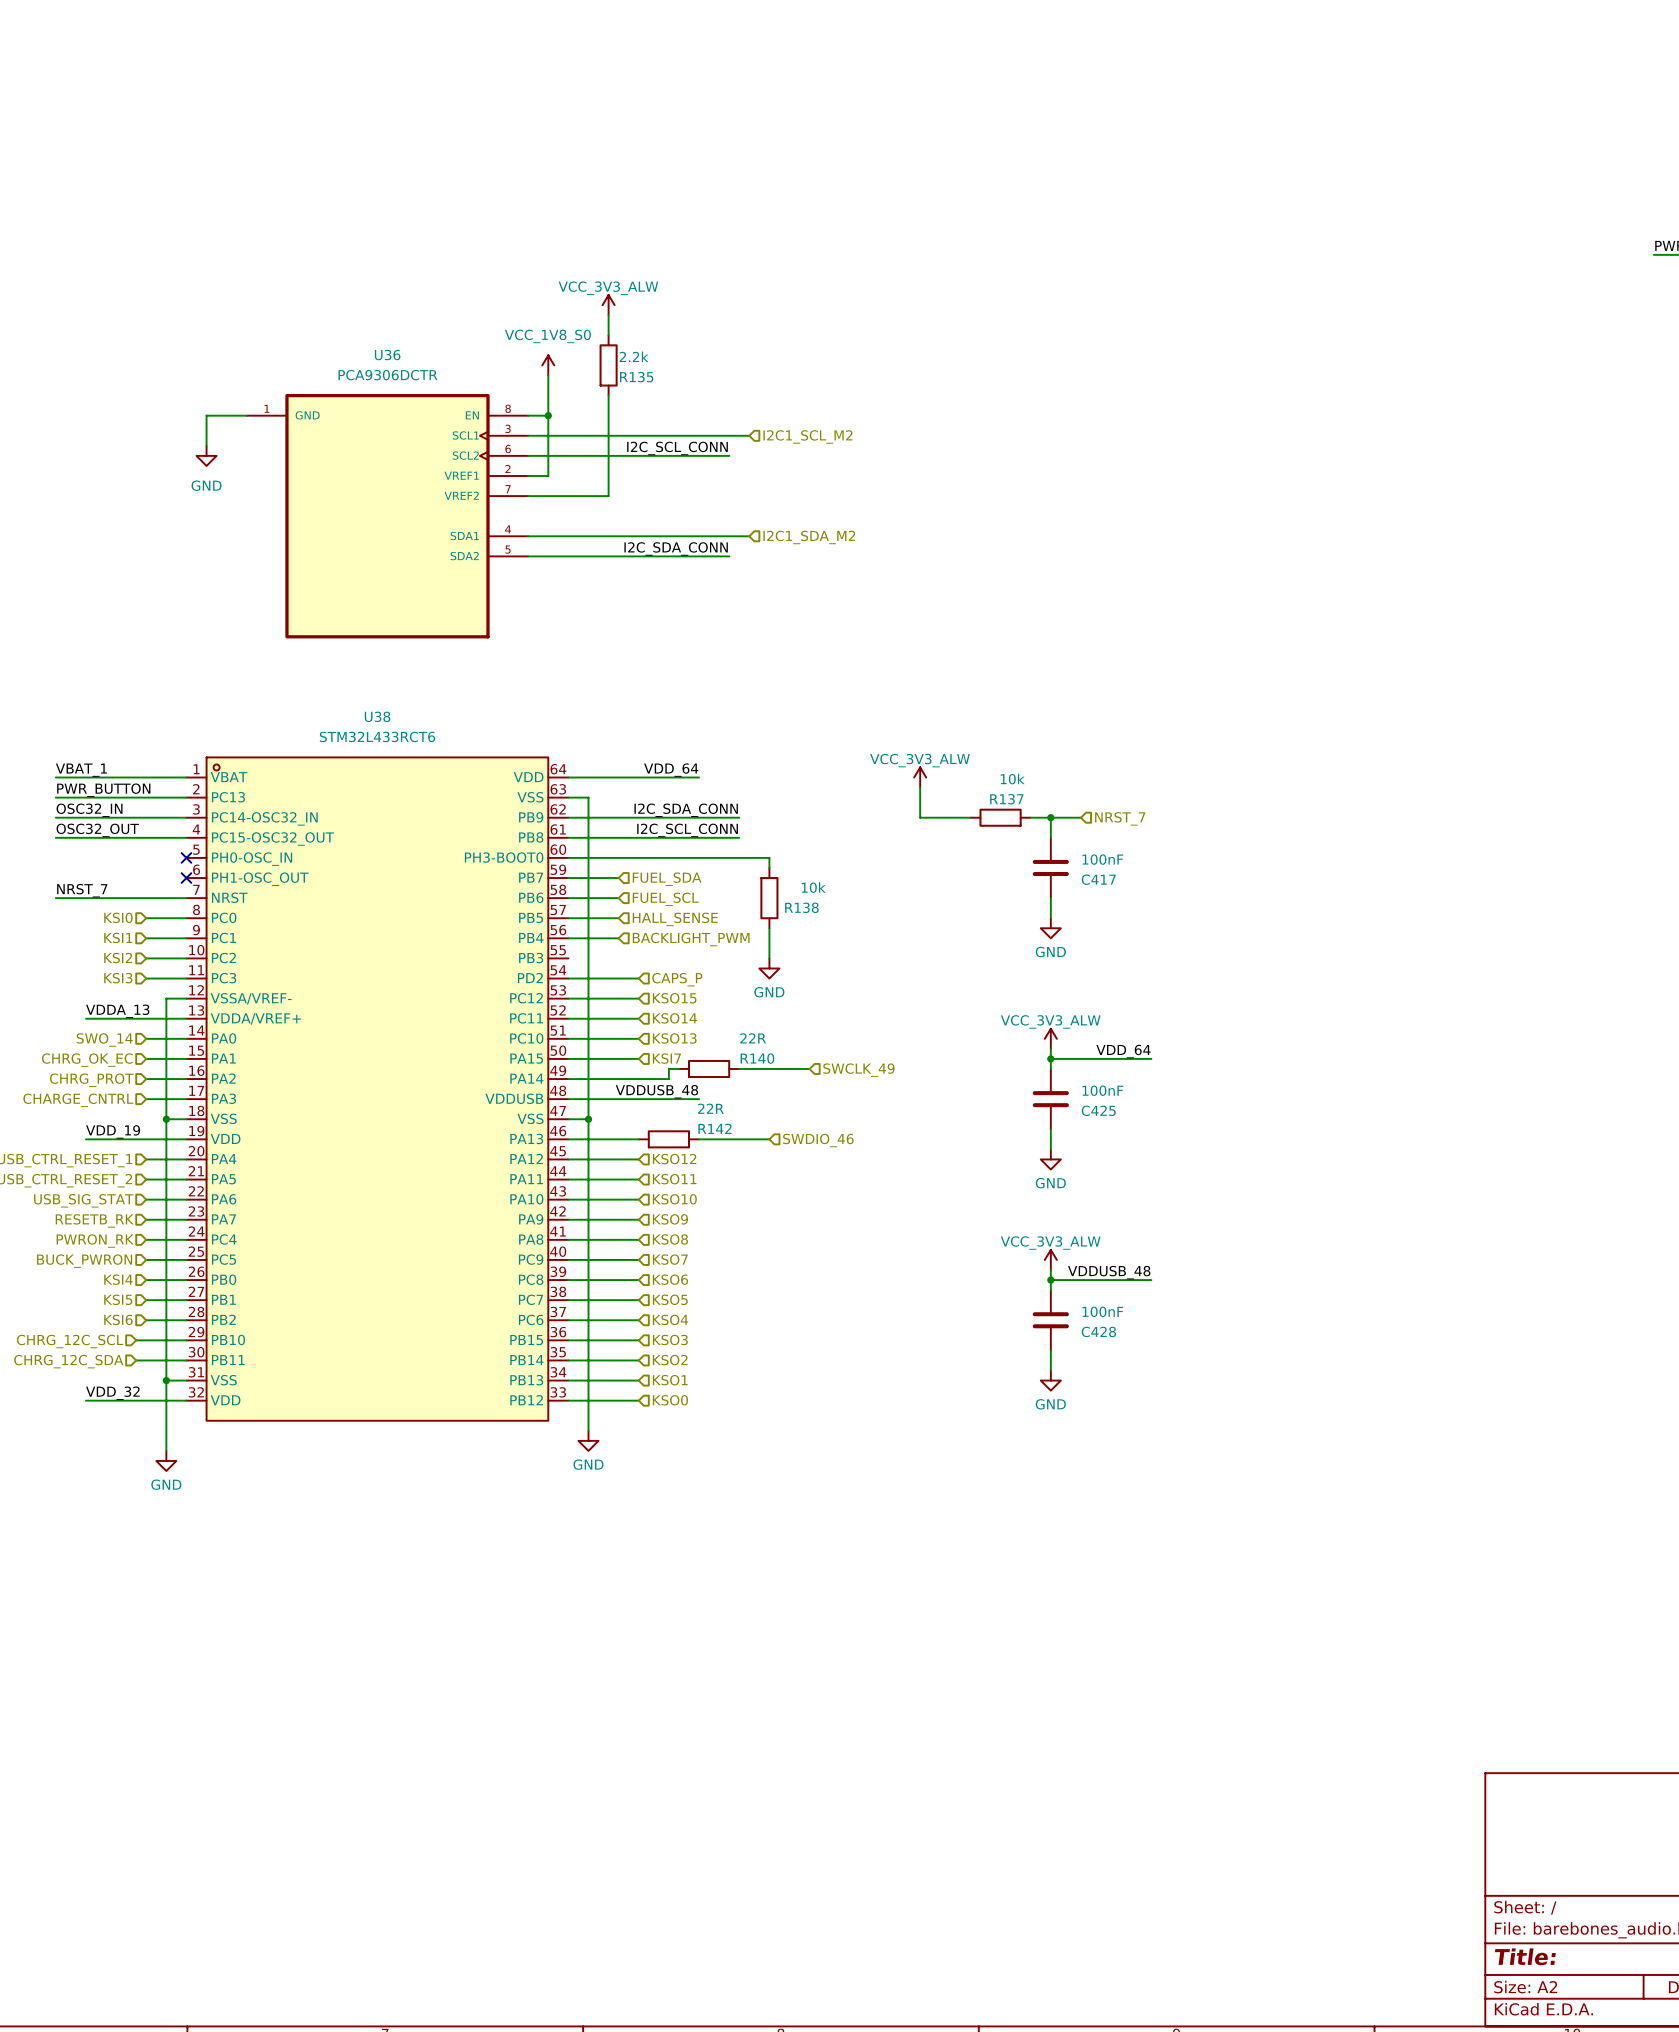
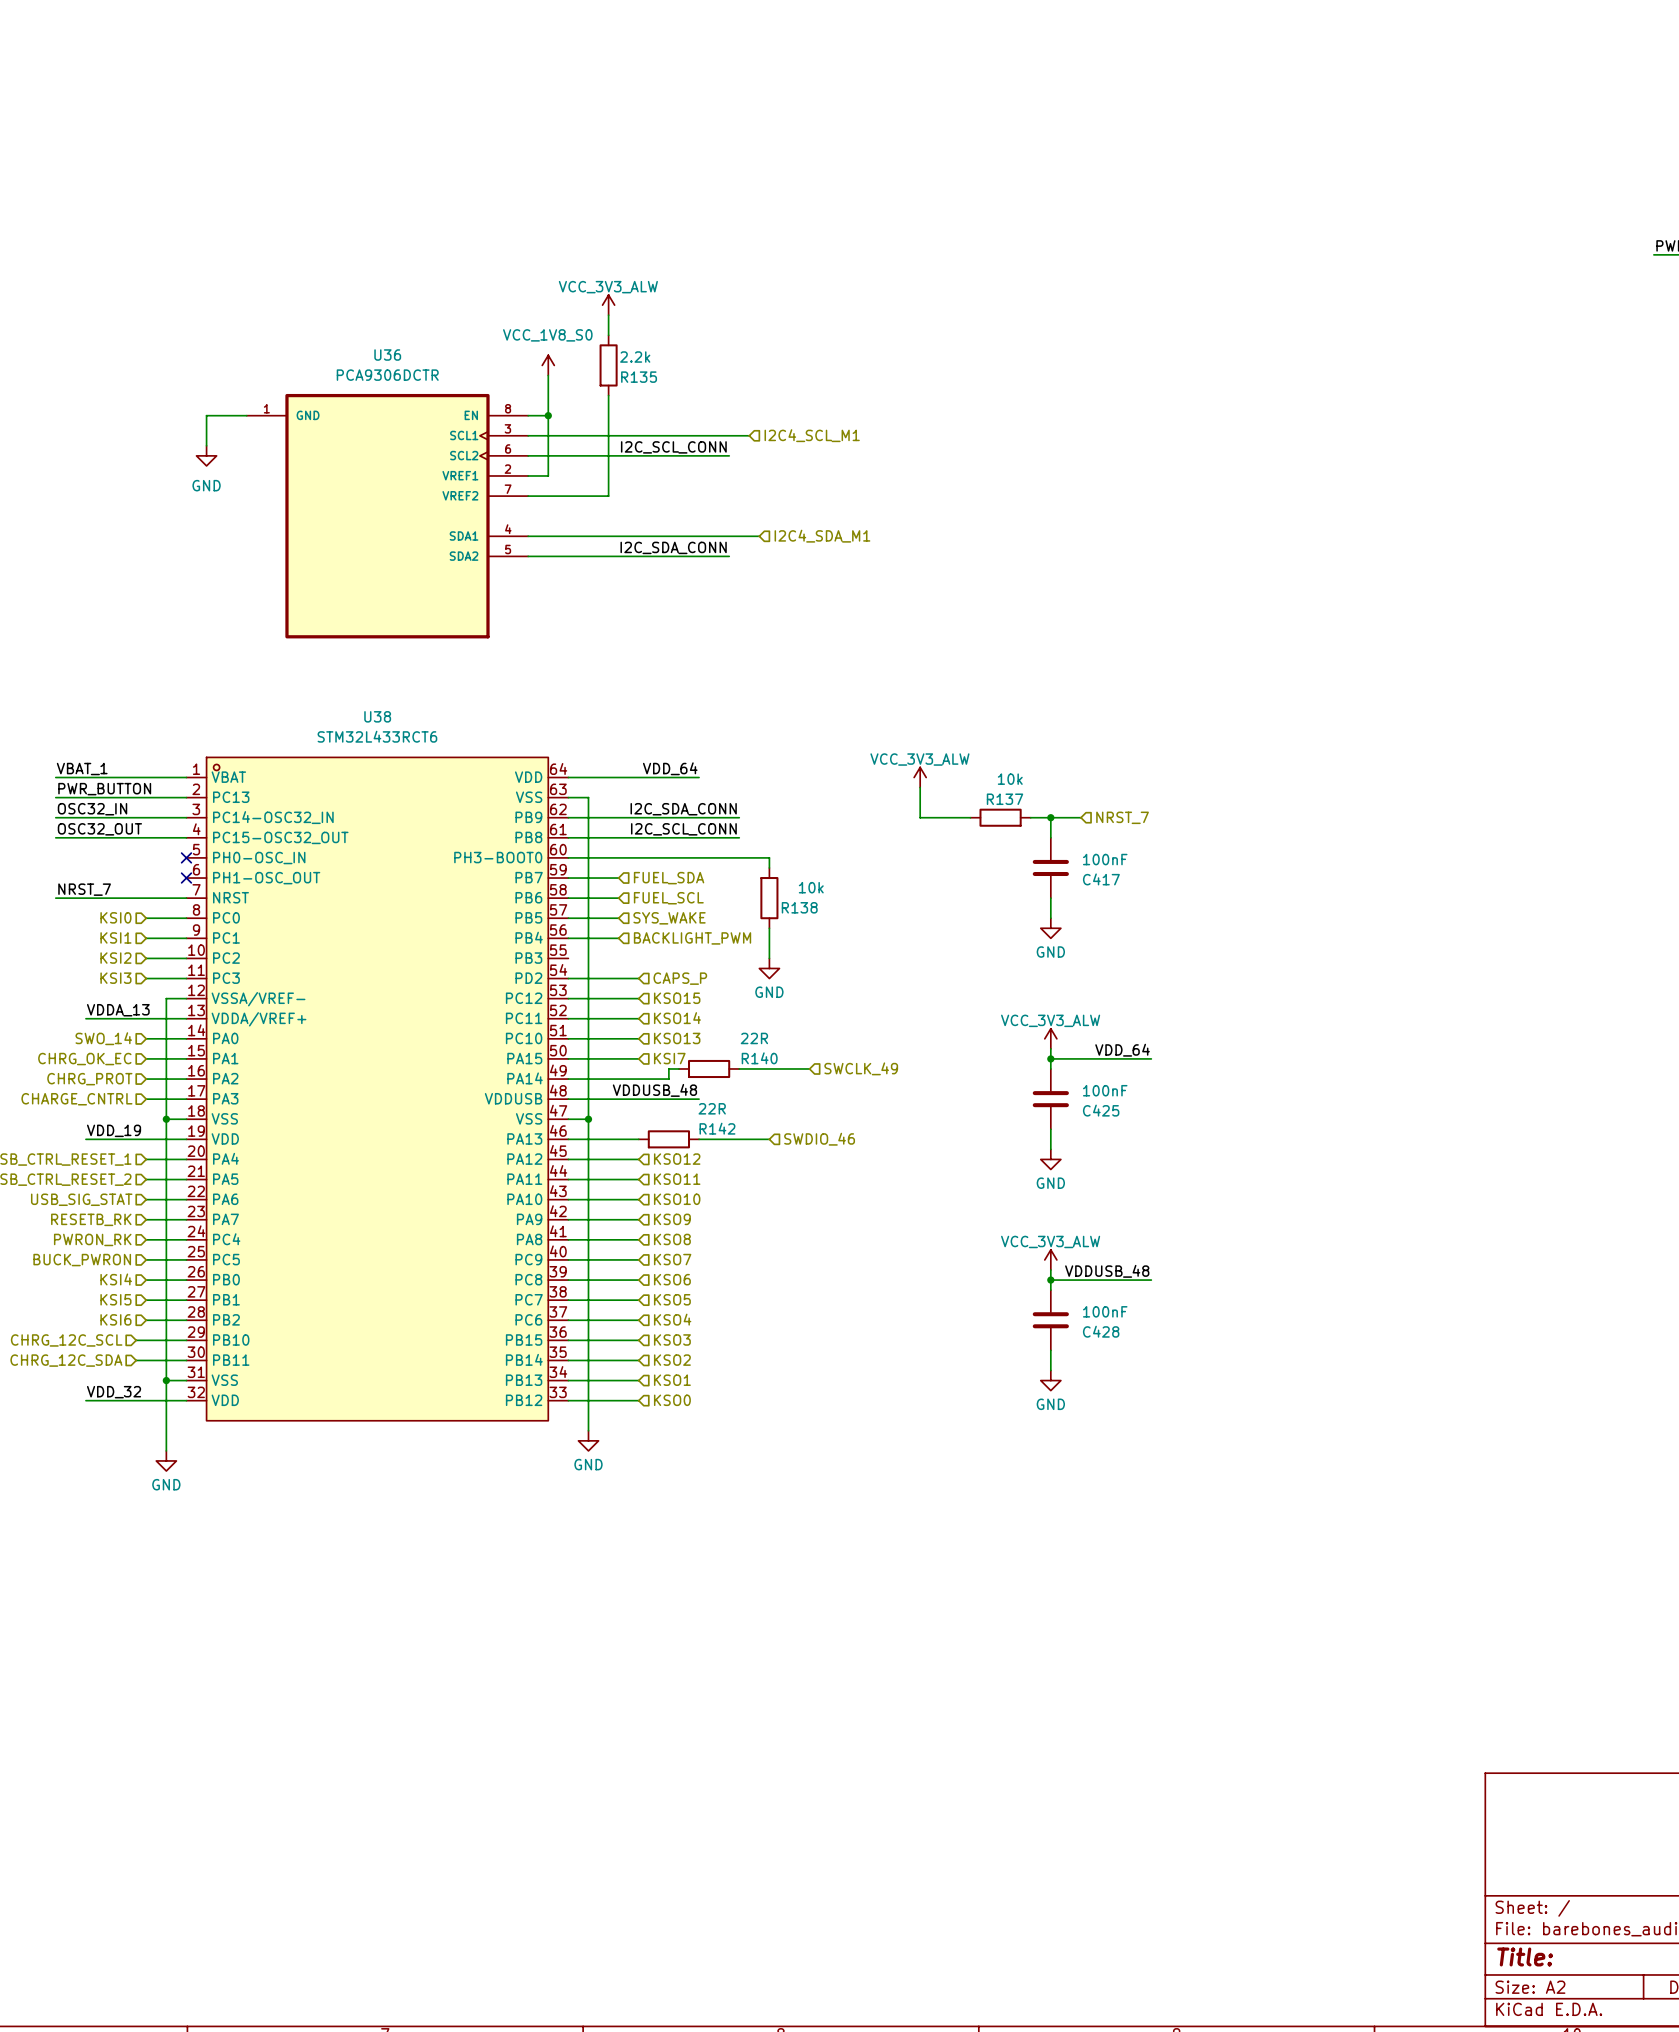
hierarchical label: I2C1_SCL_M2 (807, 436) -> I2C4_SCL_M1 (812, 435)
wire: none -> (749, 536) (759, 536)
hierarchical label: I2C1_SDA_M2 (809, 537) -> I2C4_SDA_M1 (822, 536)
hierarchical label: HALL_SENSE (675, 919) -> SYS_WAKE (669, 918)

